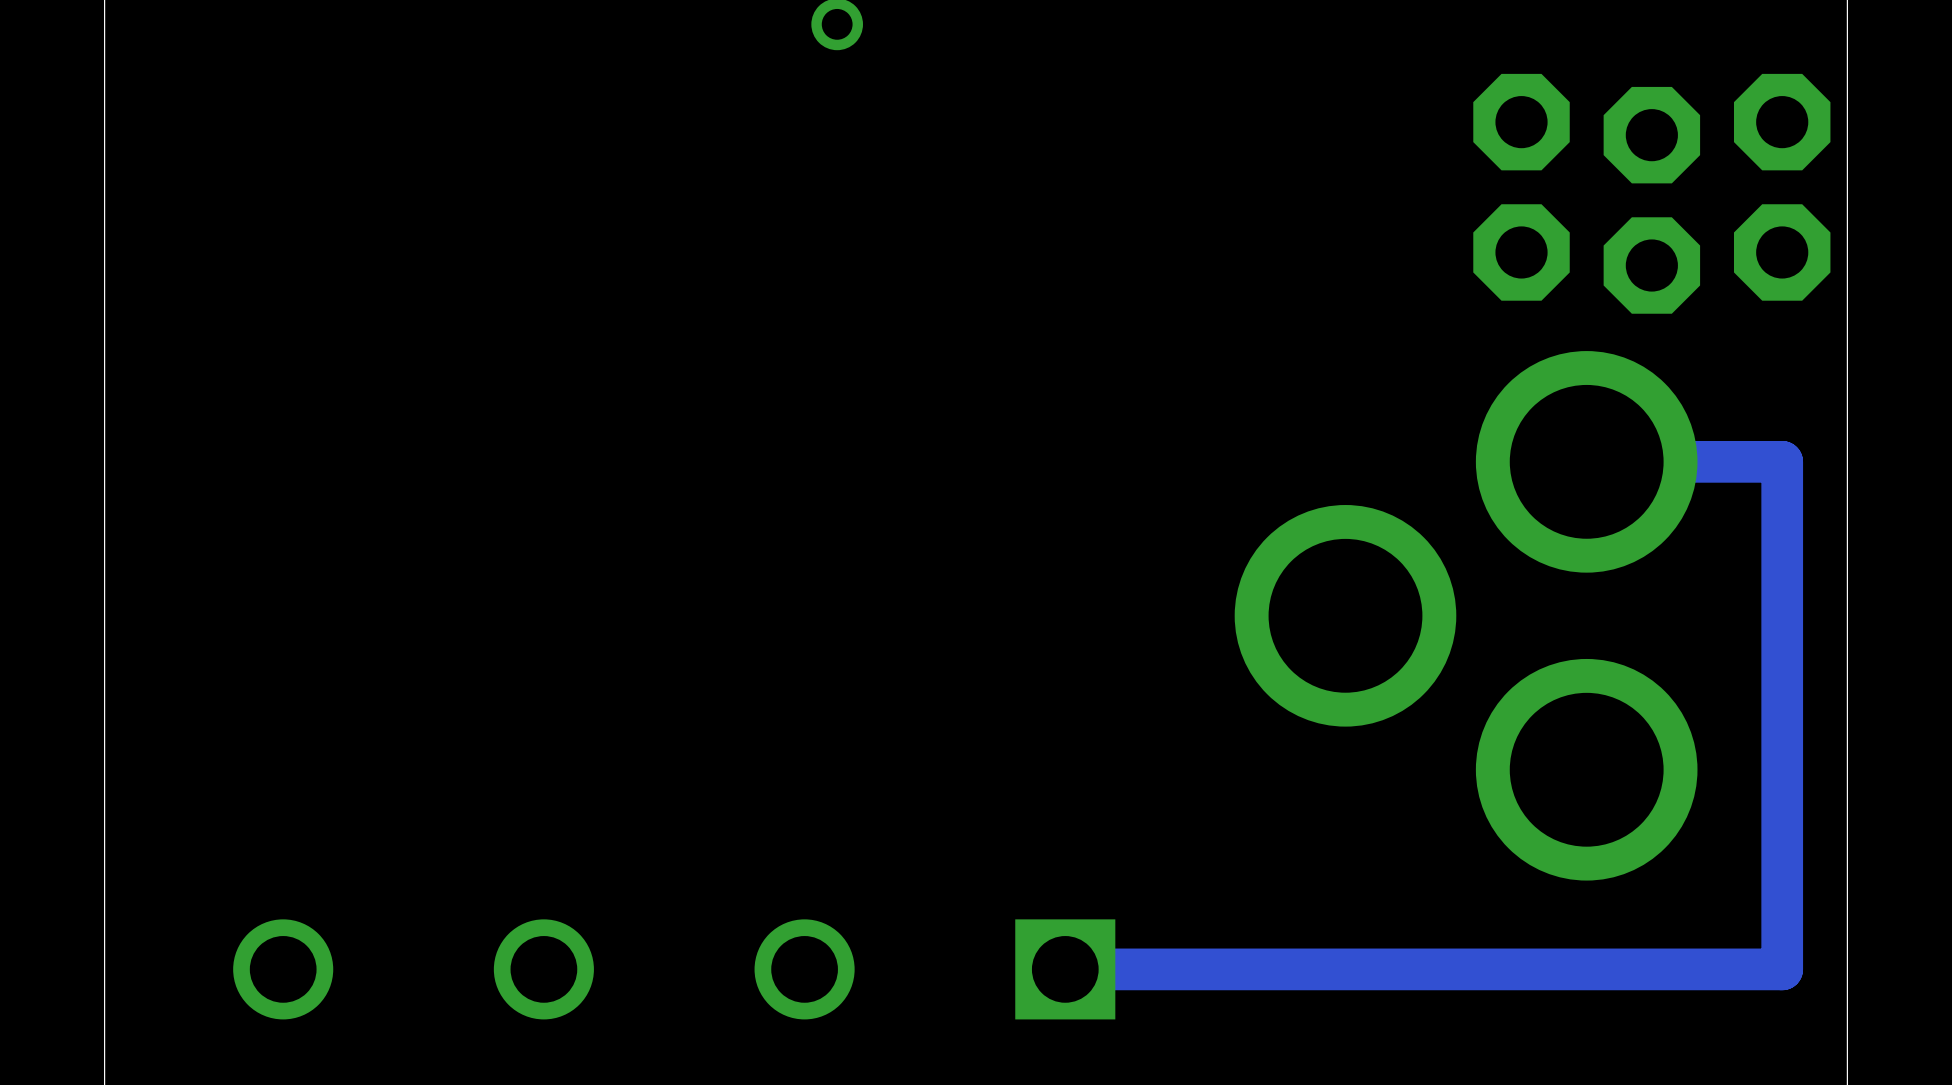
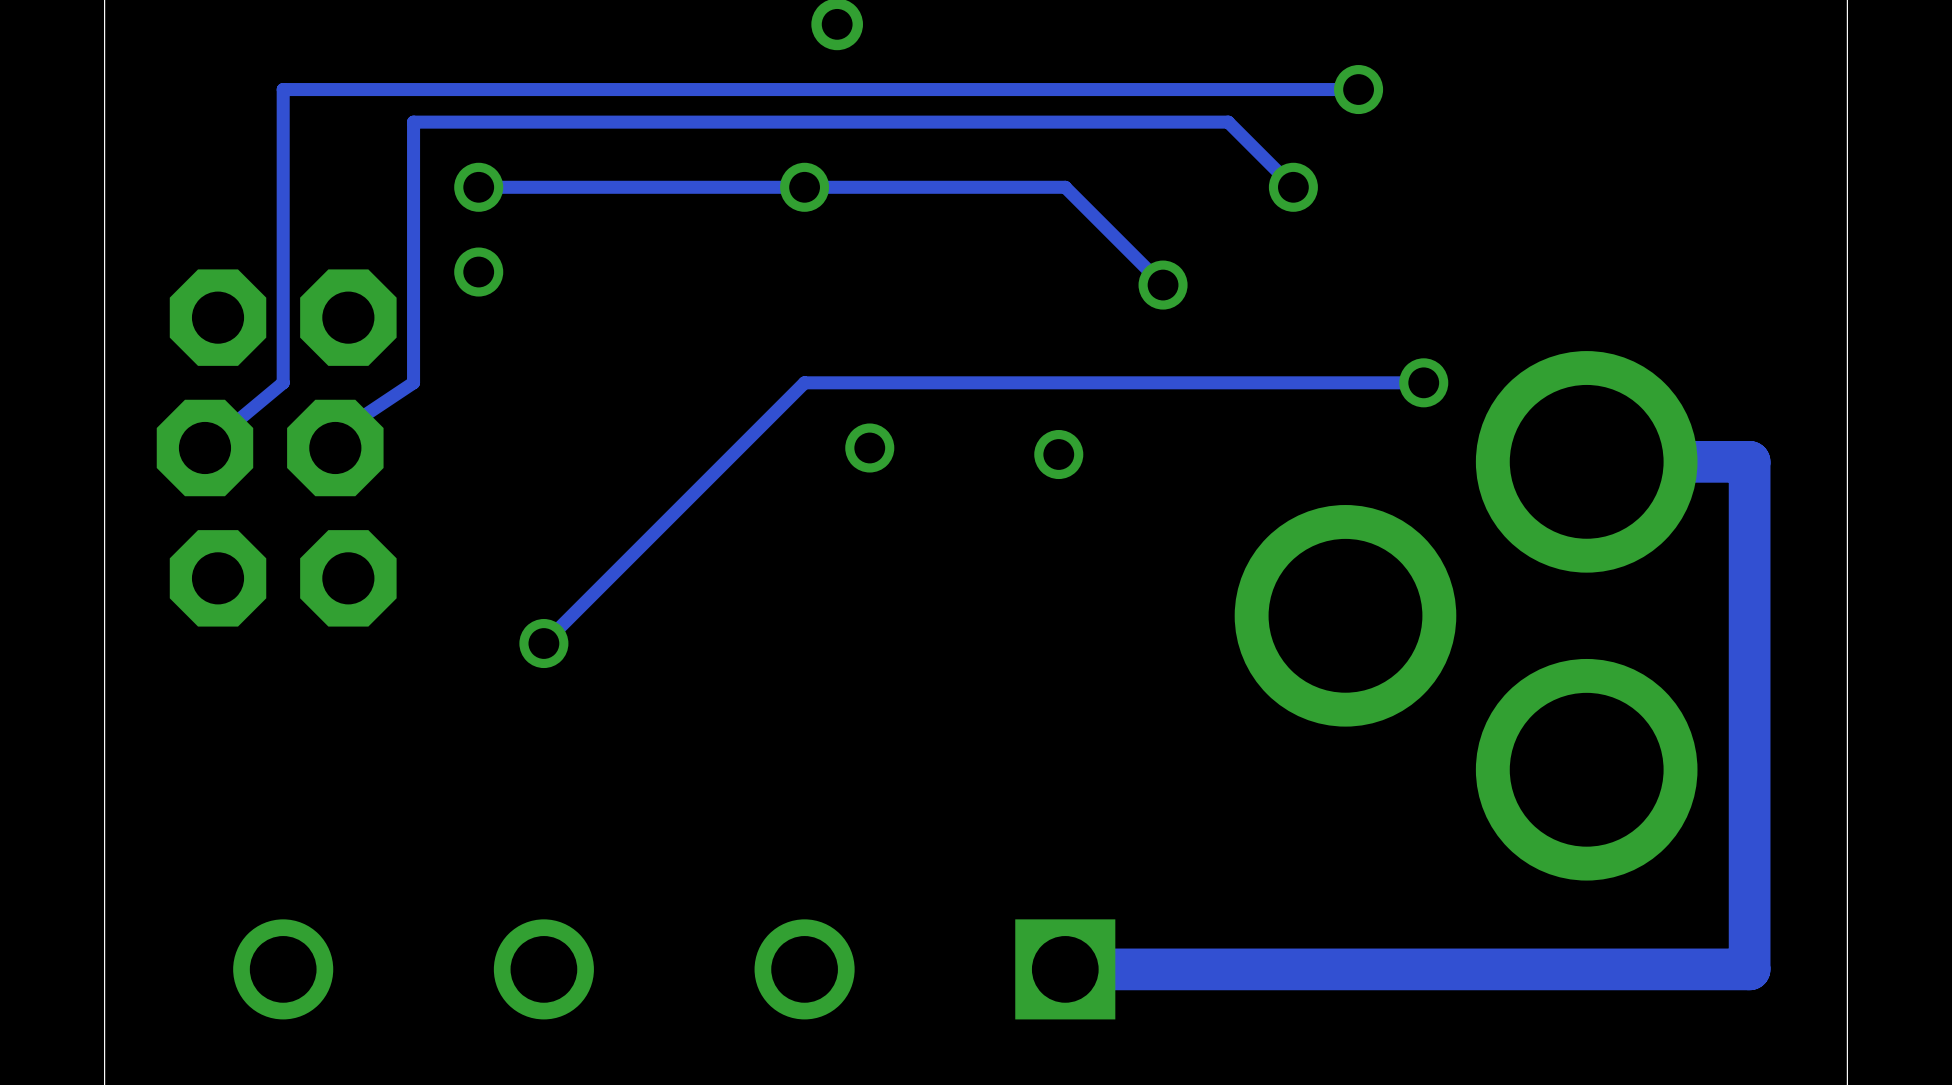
track: none -> (1358, 89) (283, 89) (283, 382) (204, 447)
via: none -> (1358, 89)
track: none -> (478, 187) (1065, 187) (1163, 285)
via: none -> (478, 187)
via: none -> (804, 187)
track: none -> (1293, 187) (1228, 122) (413, 122) (413, 382) (335, 434) (335, 447)
via: none -> (1293, 187)
part: (1651, 193) -> none
via: none -> (478, 272)
via: none -> (1163, 285)
track: none -> (1423, 382) (804, 382) (543, 643)
via: none -> (1423, 382)
part: none -> (276, 447)
via: none -> (869, 447)
via: none -> (1058, 454)
track: (1749, 461) (1782, 461) (1782, 969) (1749, 969) -> (1749, 461) (1749, 969)
via: none -> (543, 643)

